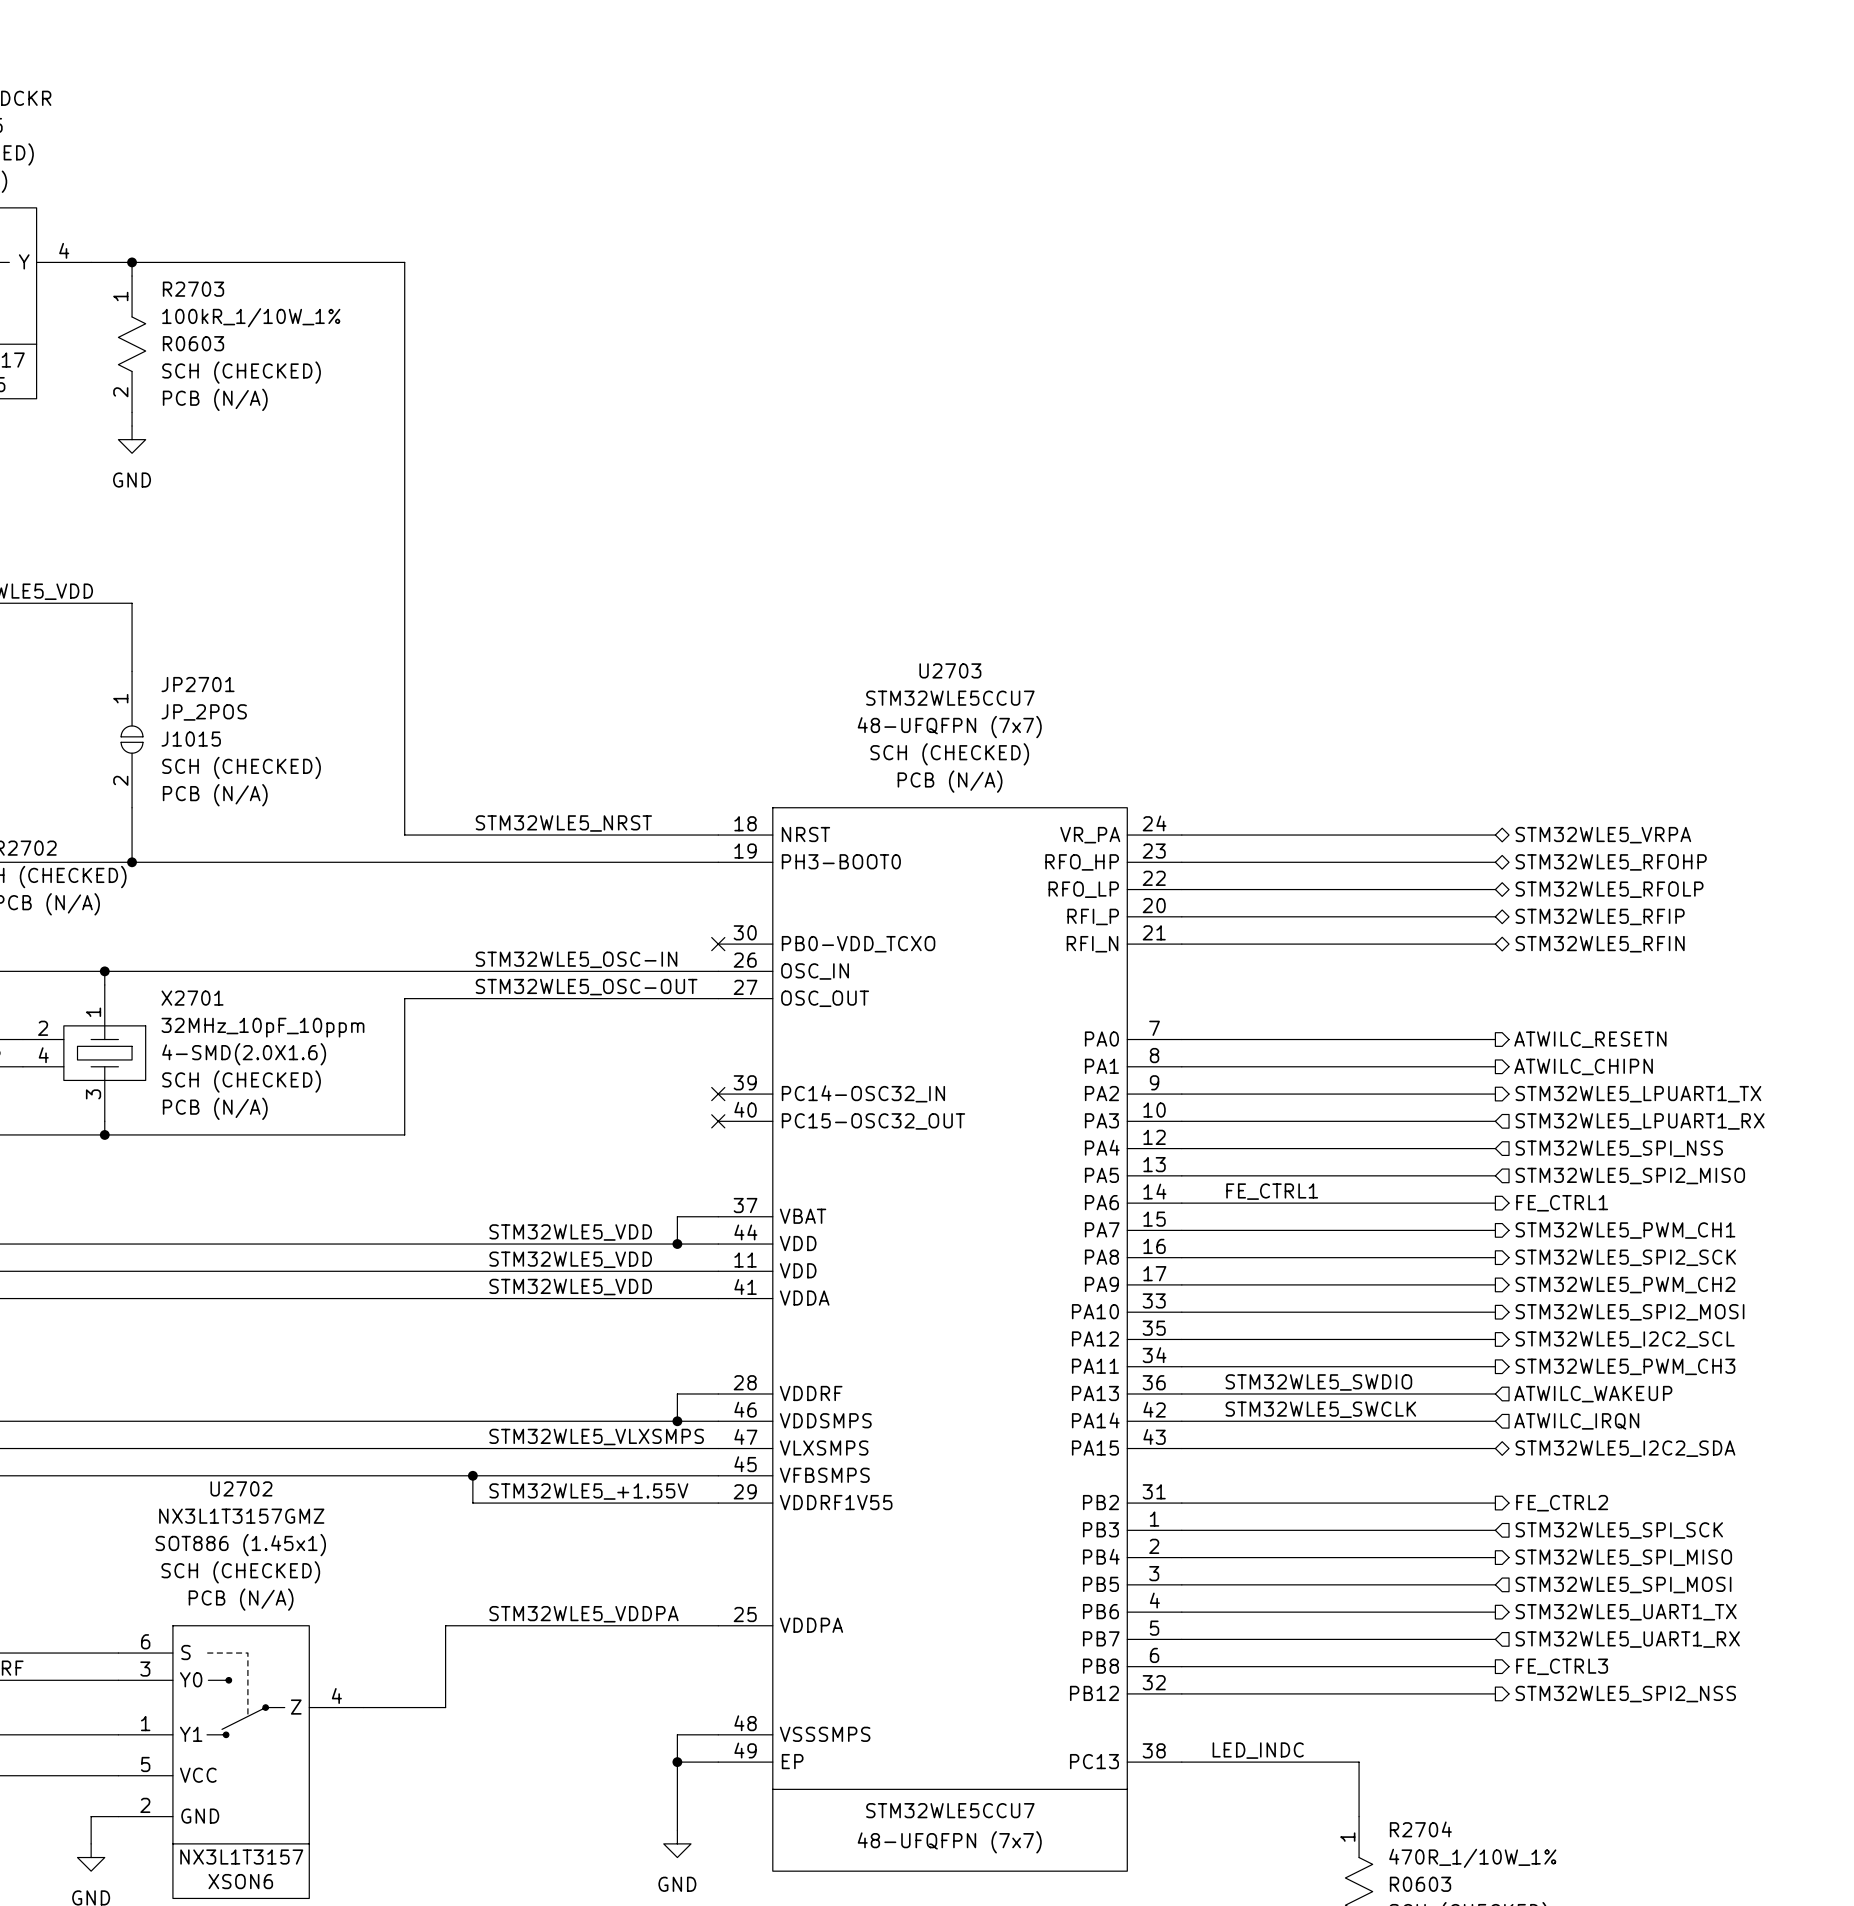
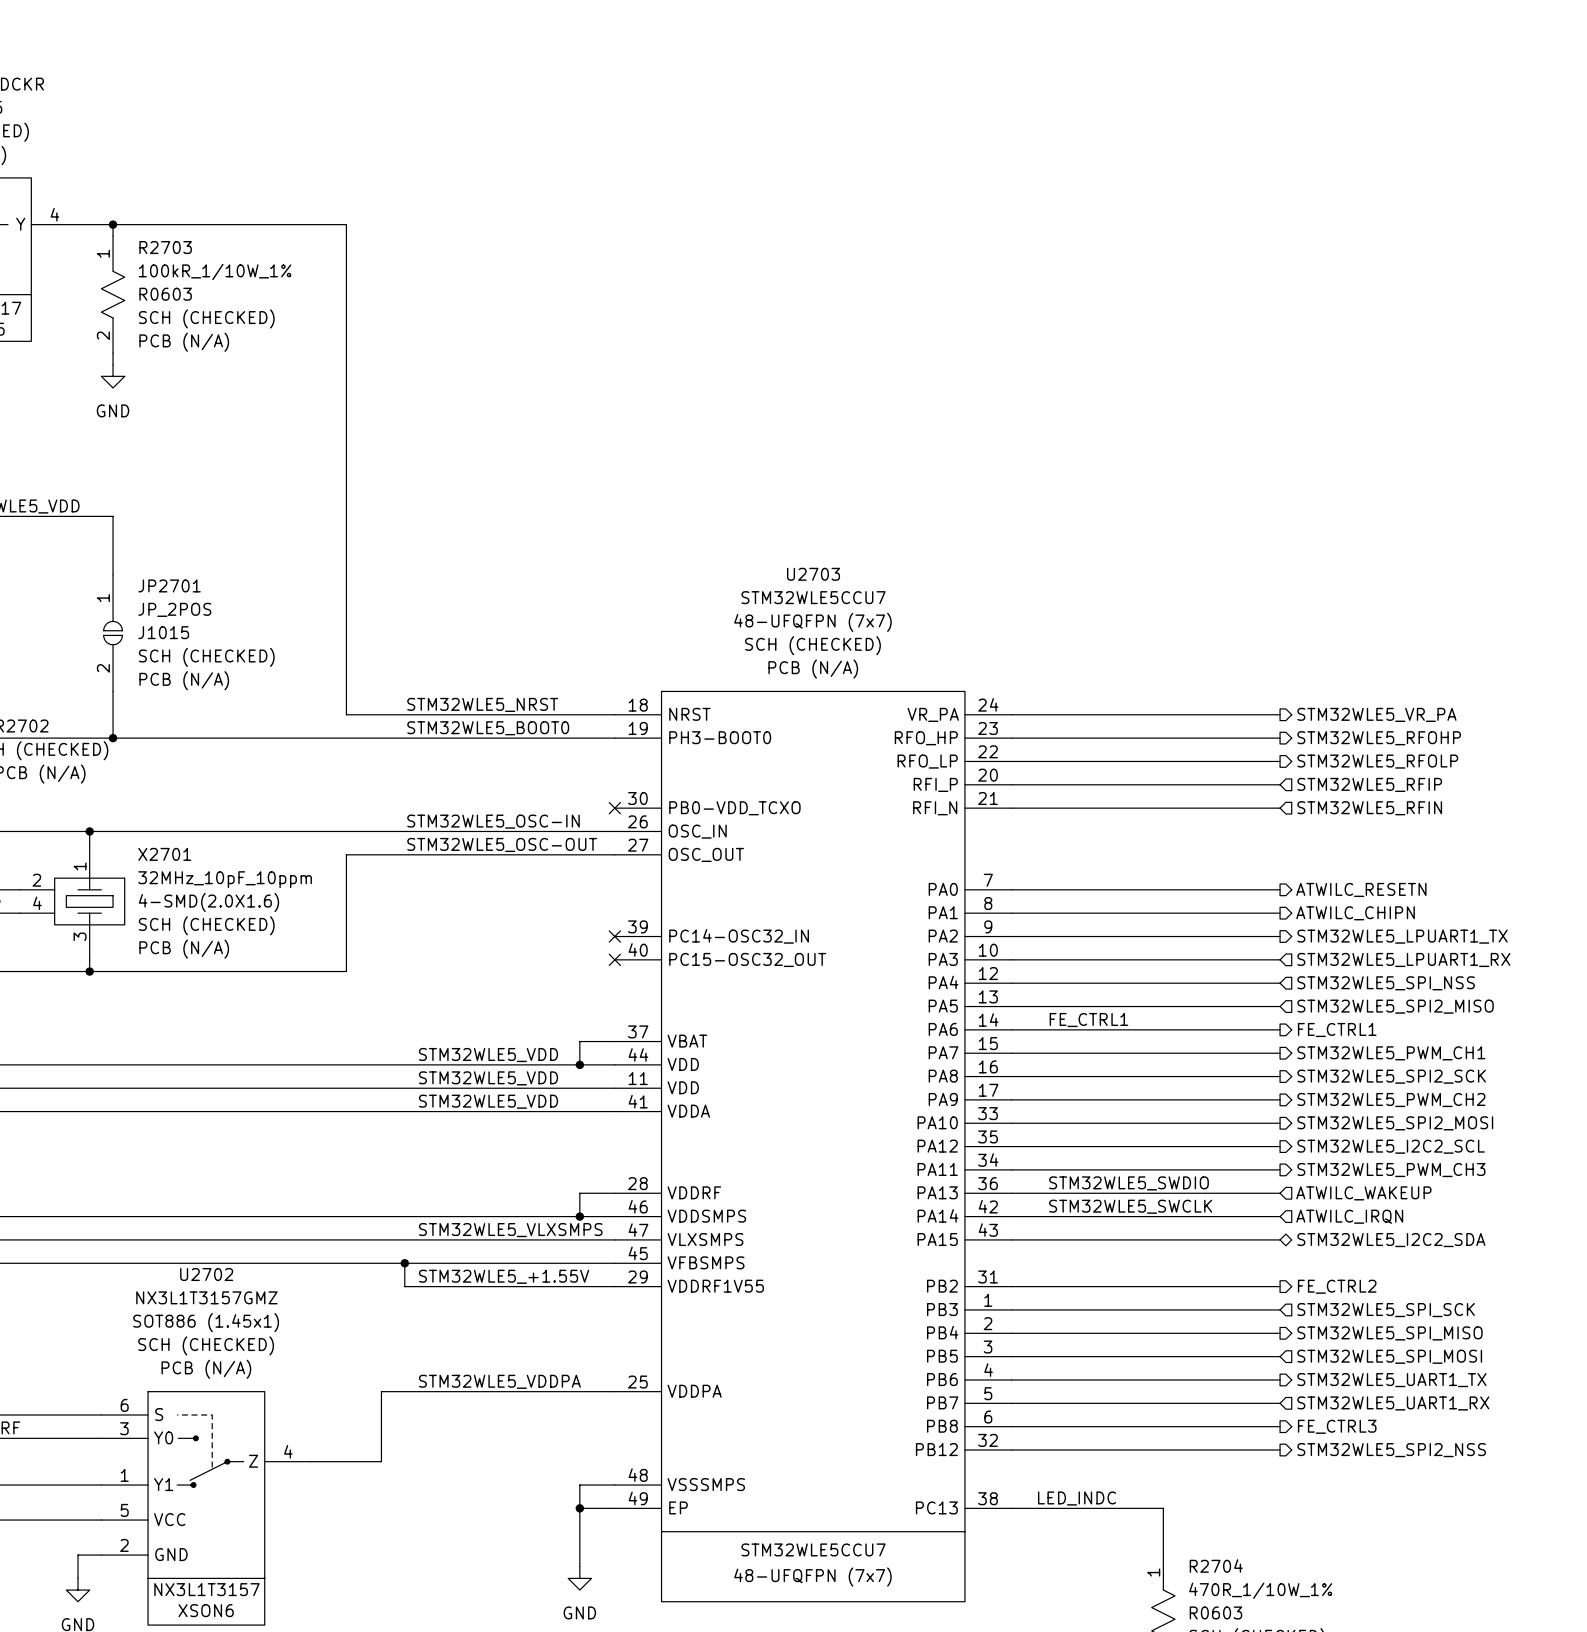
hierarchical label shape: bidirectional (1603, 835) -> output (1376, 714)
hierarchical label: STM32WLE5_VRPA (1603, 835) -> STM32WLE5_VR_PA (1376, 714)
label: none -> STM32WLE5_BOOT0 (488, 728)
hierarchical label shape: bidirectional (1611, 862) -> output (1379, 738)
hierarchical label shape: bidirectional (1609, 889) -> output (1377, 761)
hierarchical label shape: bidirectional (1600, 916) -> input (1369, 784)
hierarchical label shape: bidirectional (1600, 944) -> input (1369, 808)

